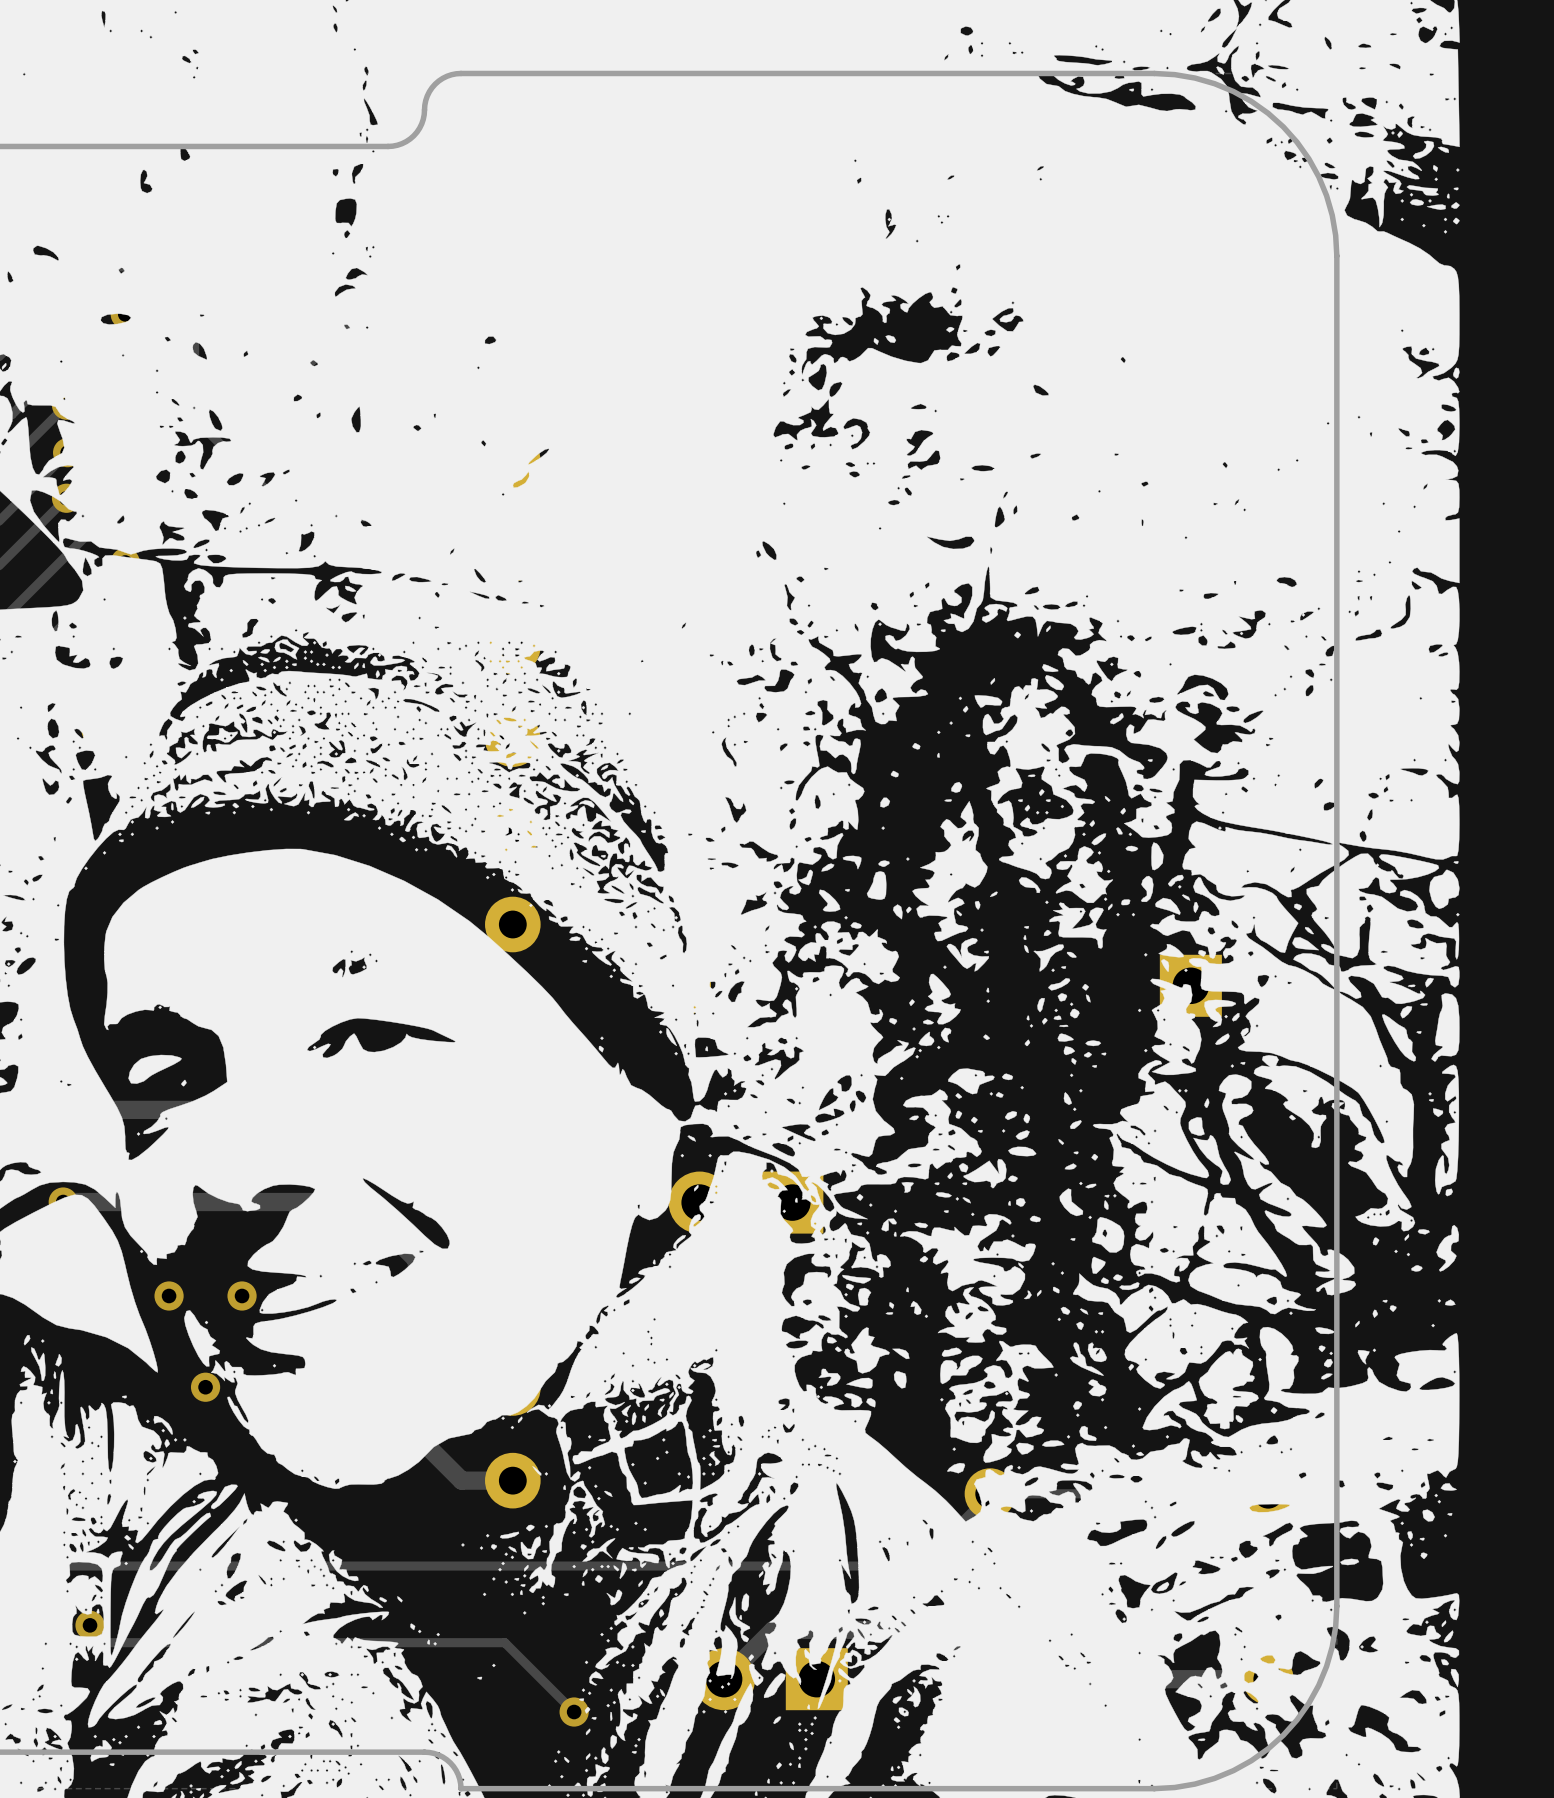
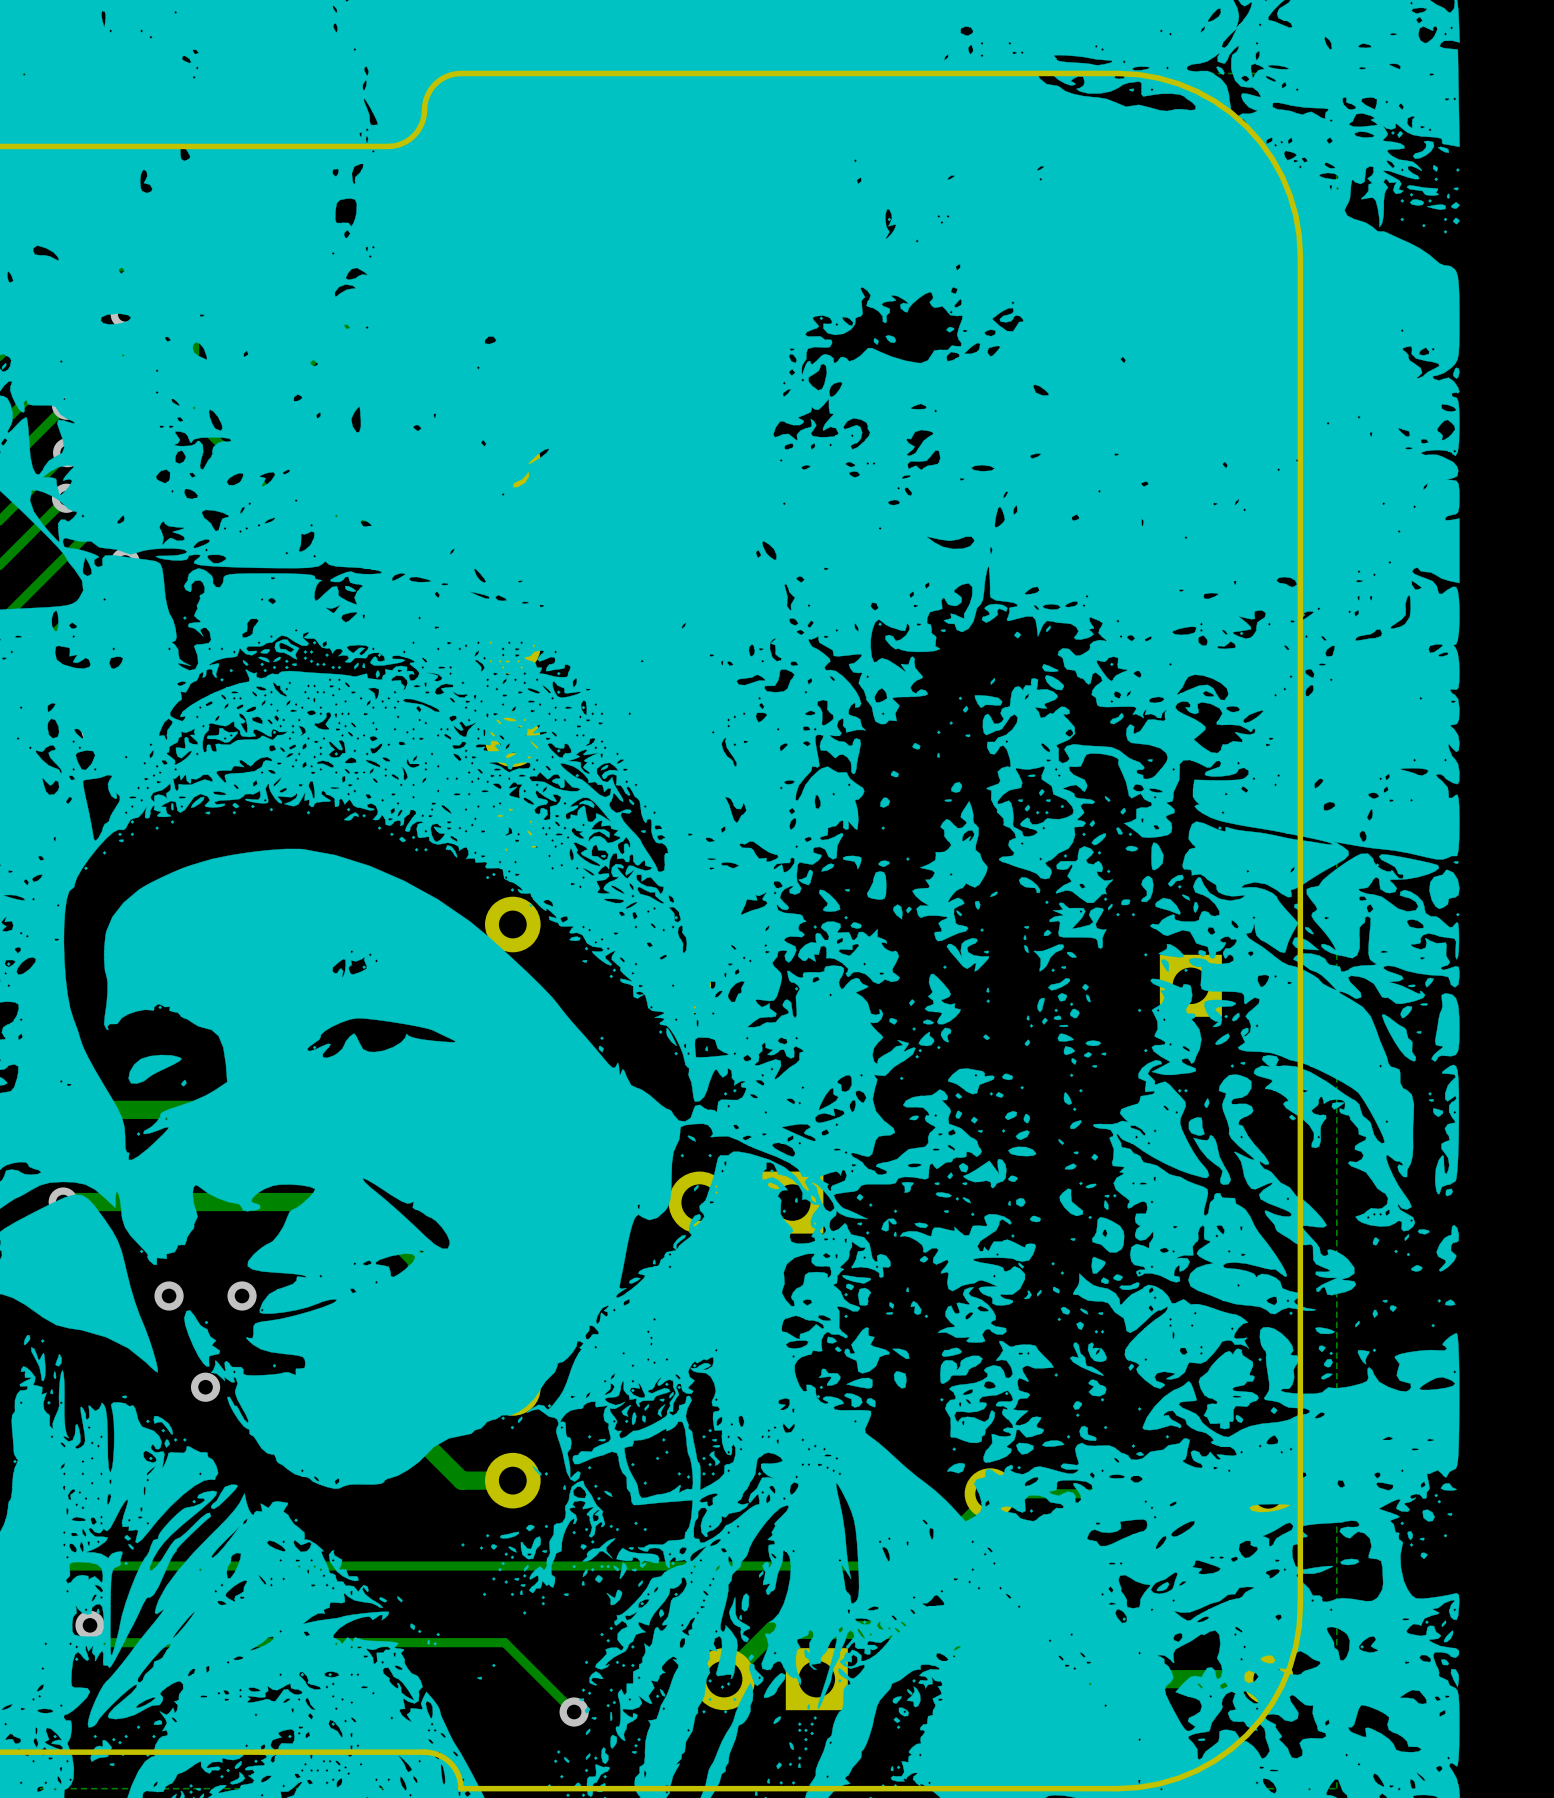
board edge: (1117, 73) (1174, 74) (1194, 78) (1233, 91) (1268, 113) (1297, 142) (1318, 176) (1332, 215) (1336, 255) (1335, 1626) (1326, 1666) (1308, 1703) (1283, 1735) (1268, 1748) (1233, 1770) (1194, 1784) (1174, 1787) (1117, 1788) -> (1117, 73) (1138, 74) (1178, 83) (1214, 101) (1246, 126) (1272, 158) (1290, 195) (1299, 235) (1300, 255) (1299, 1626) (1290, 1666) (1282, 1685) (1272, 1703) (1246, 1735) (1214, 1760) (1178, 1778) (1138, 1787) (1117, 1788)

